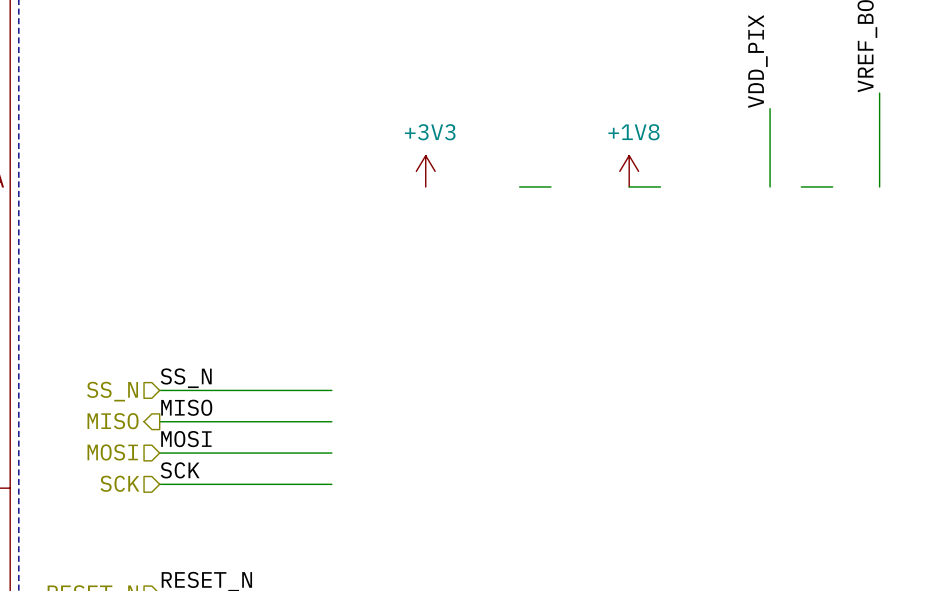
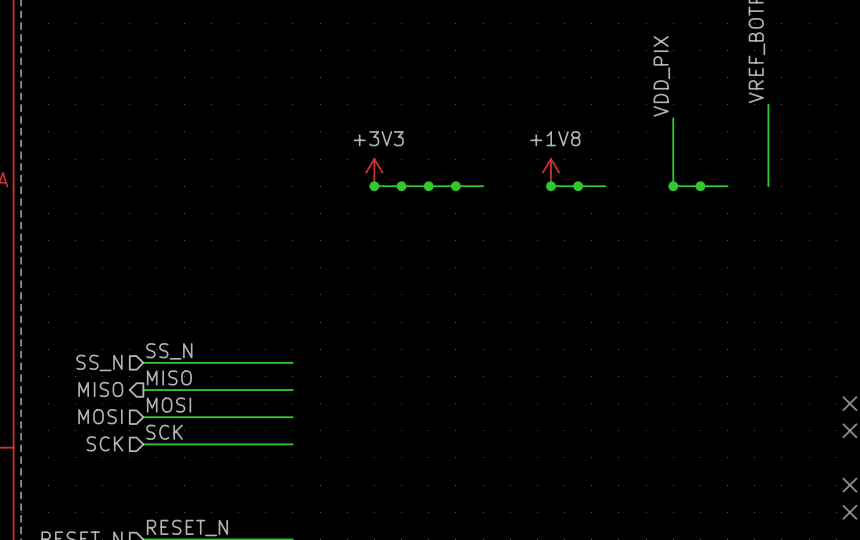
wire: none -> (374, 186) (455, 186)
junction: none -> (374, 186)
junction: none -> (401, 186)
junction: none -> (428, 186)
junction: none -> (455, 186)
junction: none -> (550, 186)
wire: none -> (578, 186) (605, 186)
junction: none -> (578, 186)
wire: none -> (673, 186) (700, 186)
junction: none -> (673, 186)
junction: none -> (700, 186)

